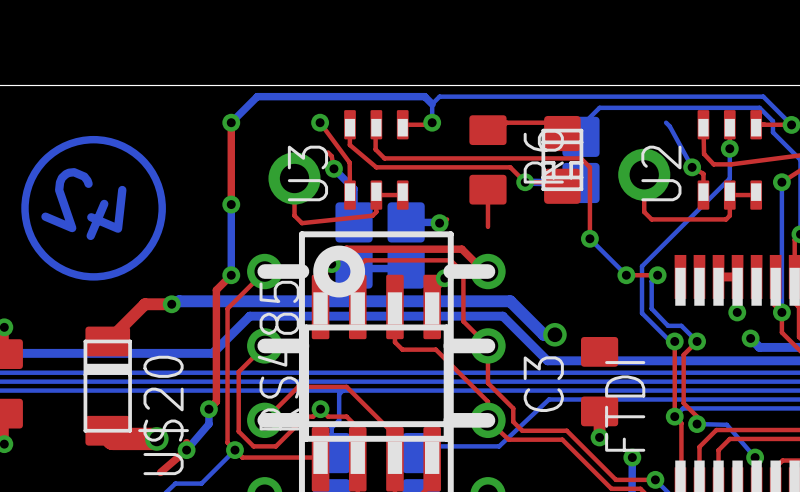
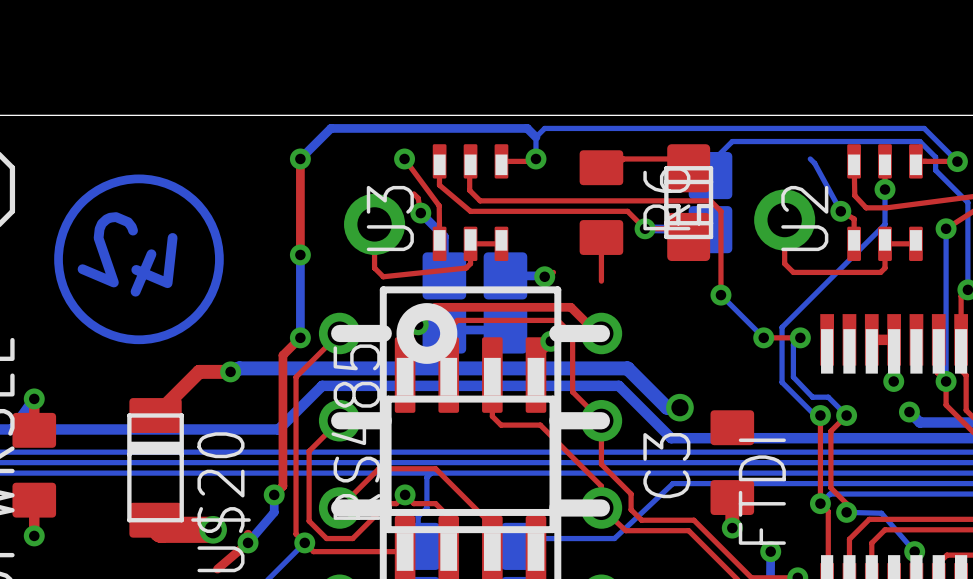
part footprint: [541, 115, 584, 204] -> [664, 144, 714, 262]

